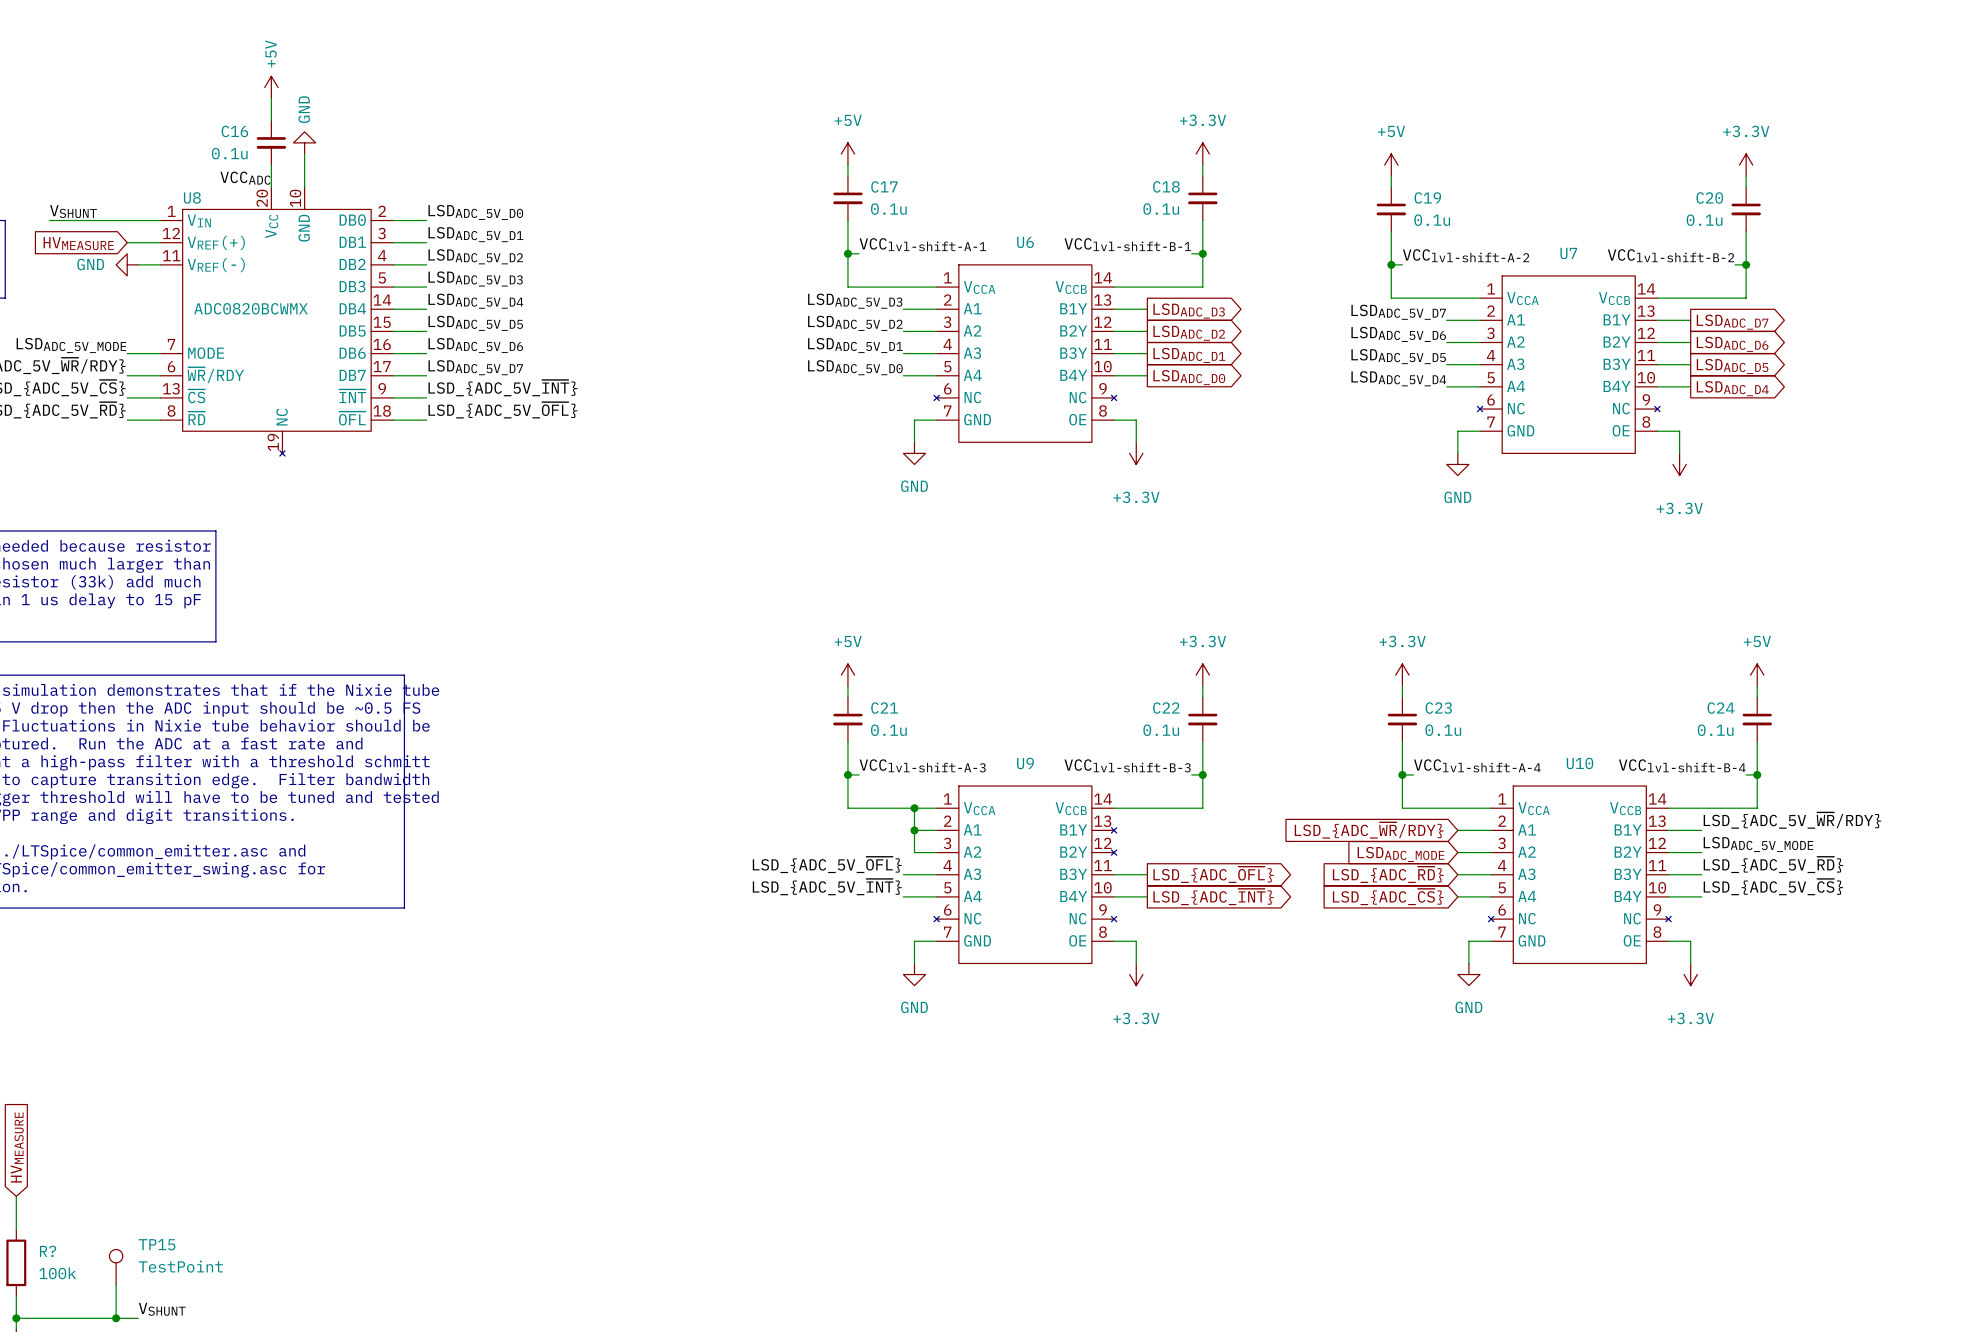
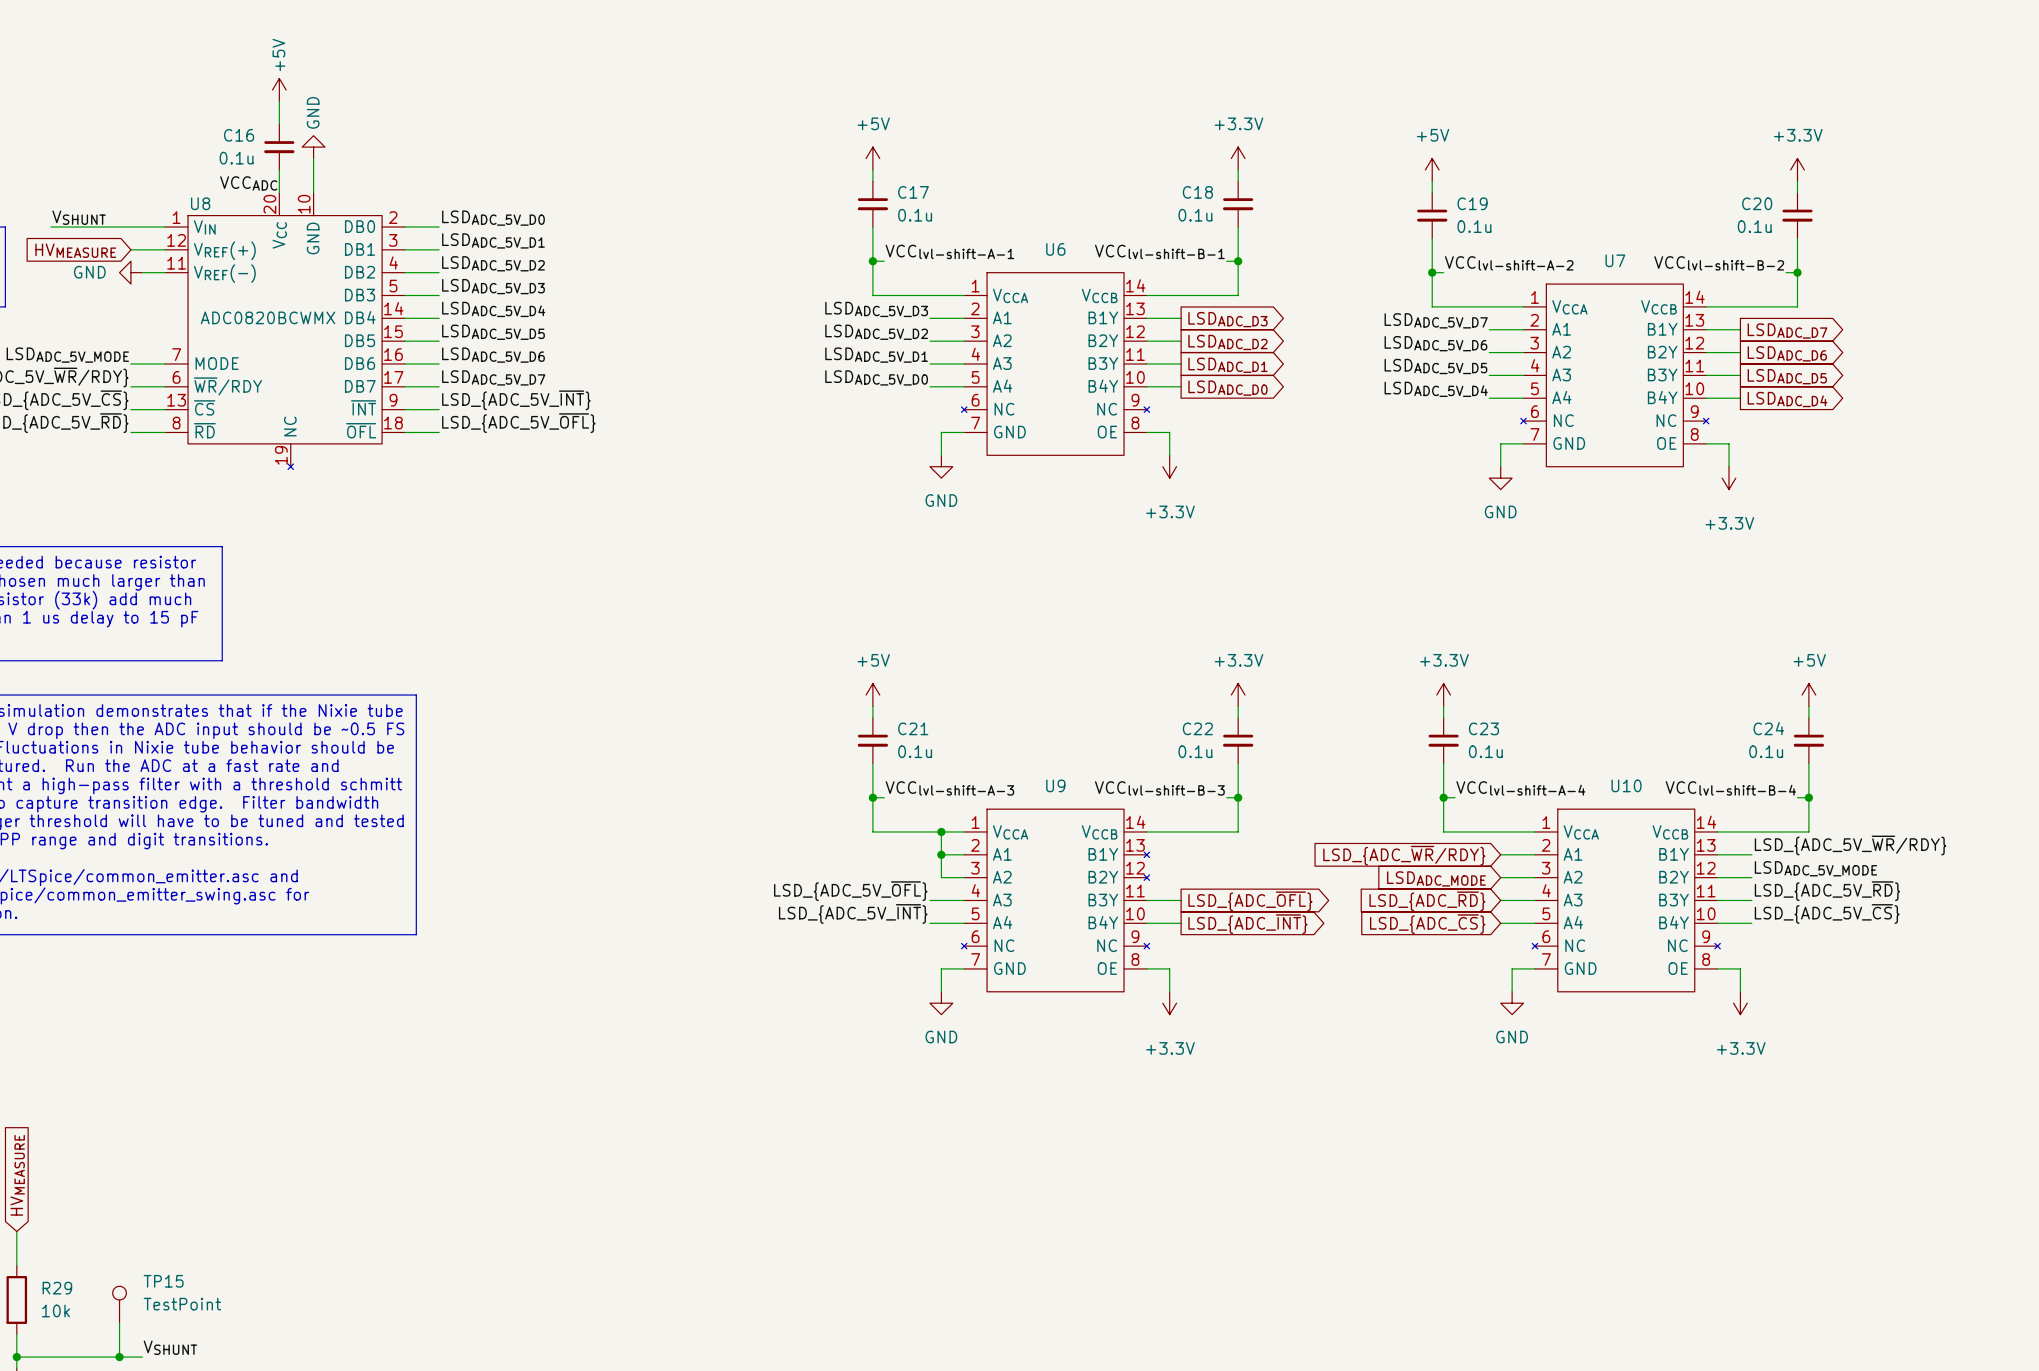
R? name: R? (48, 1251) -> R29 (57, 1288)
R? value: 100k (57, 1273) -> 10k (56, 1310)

